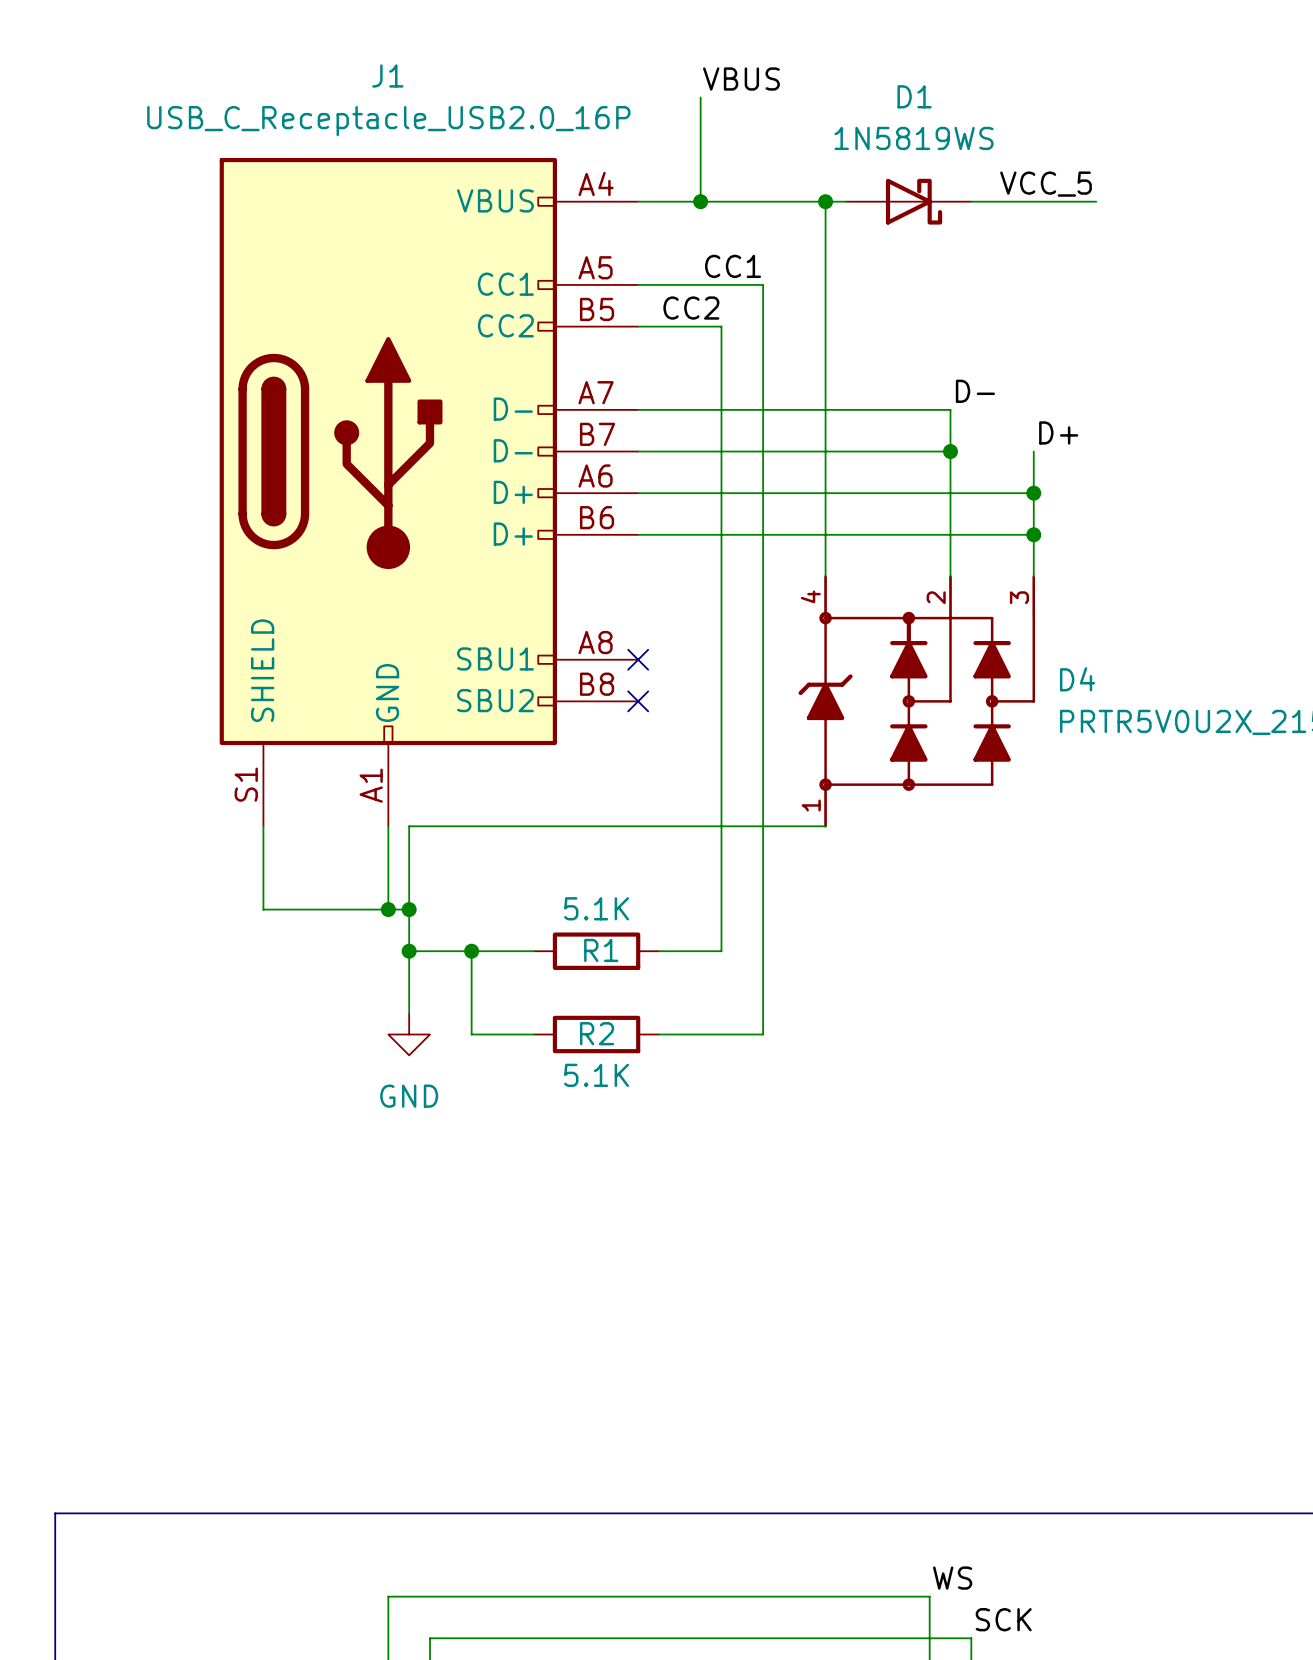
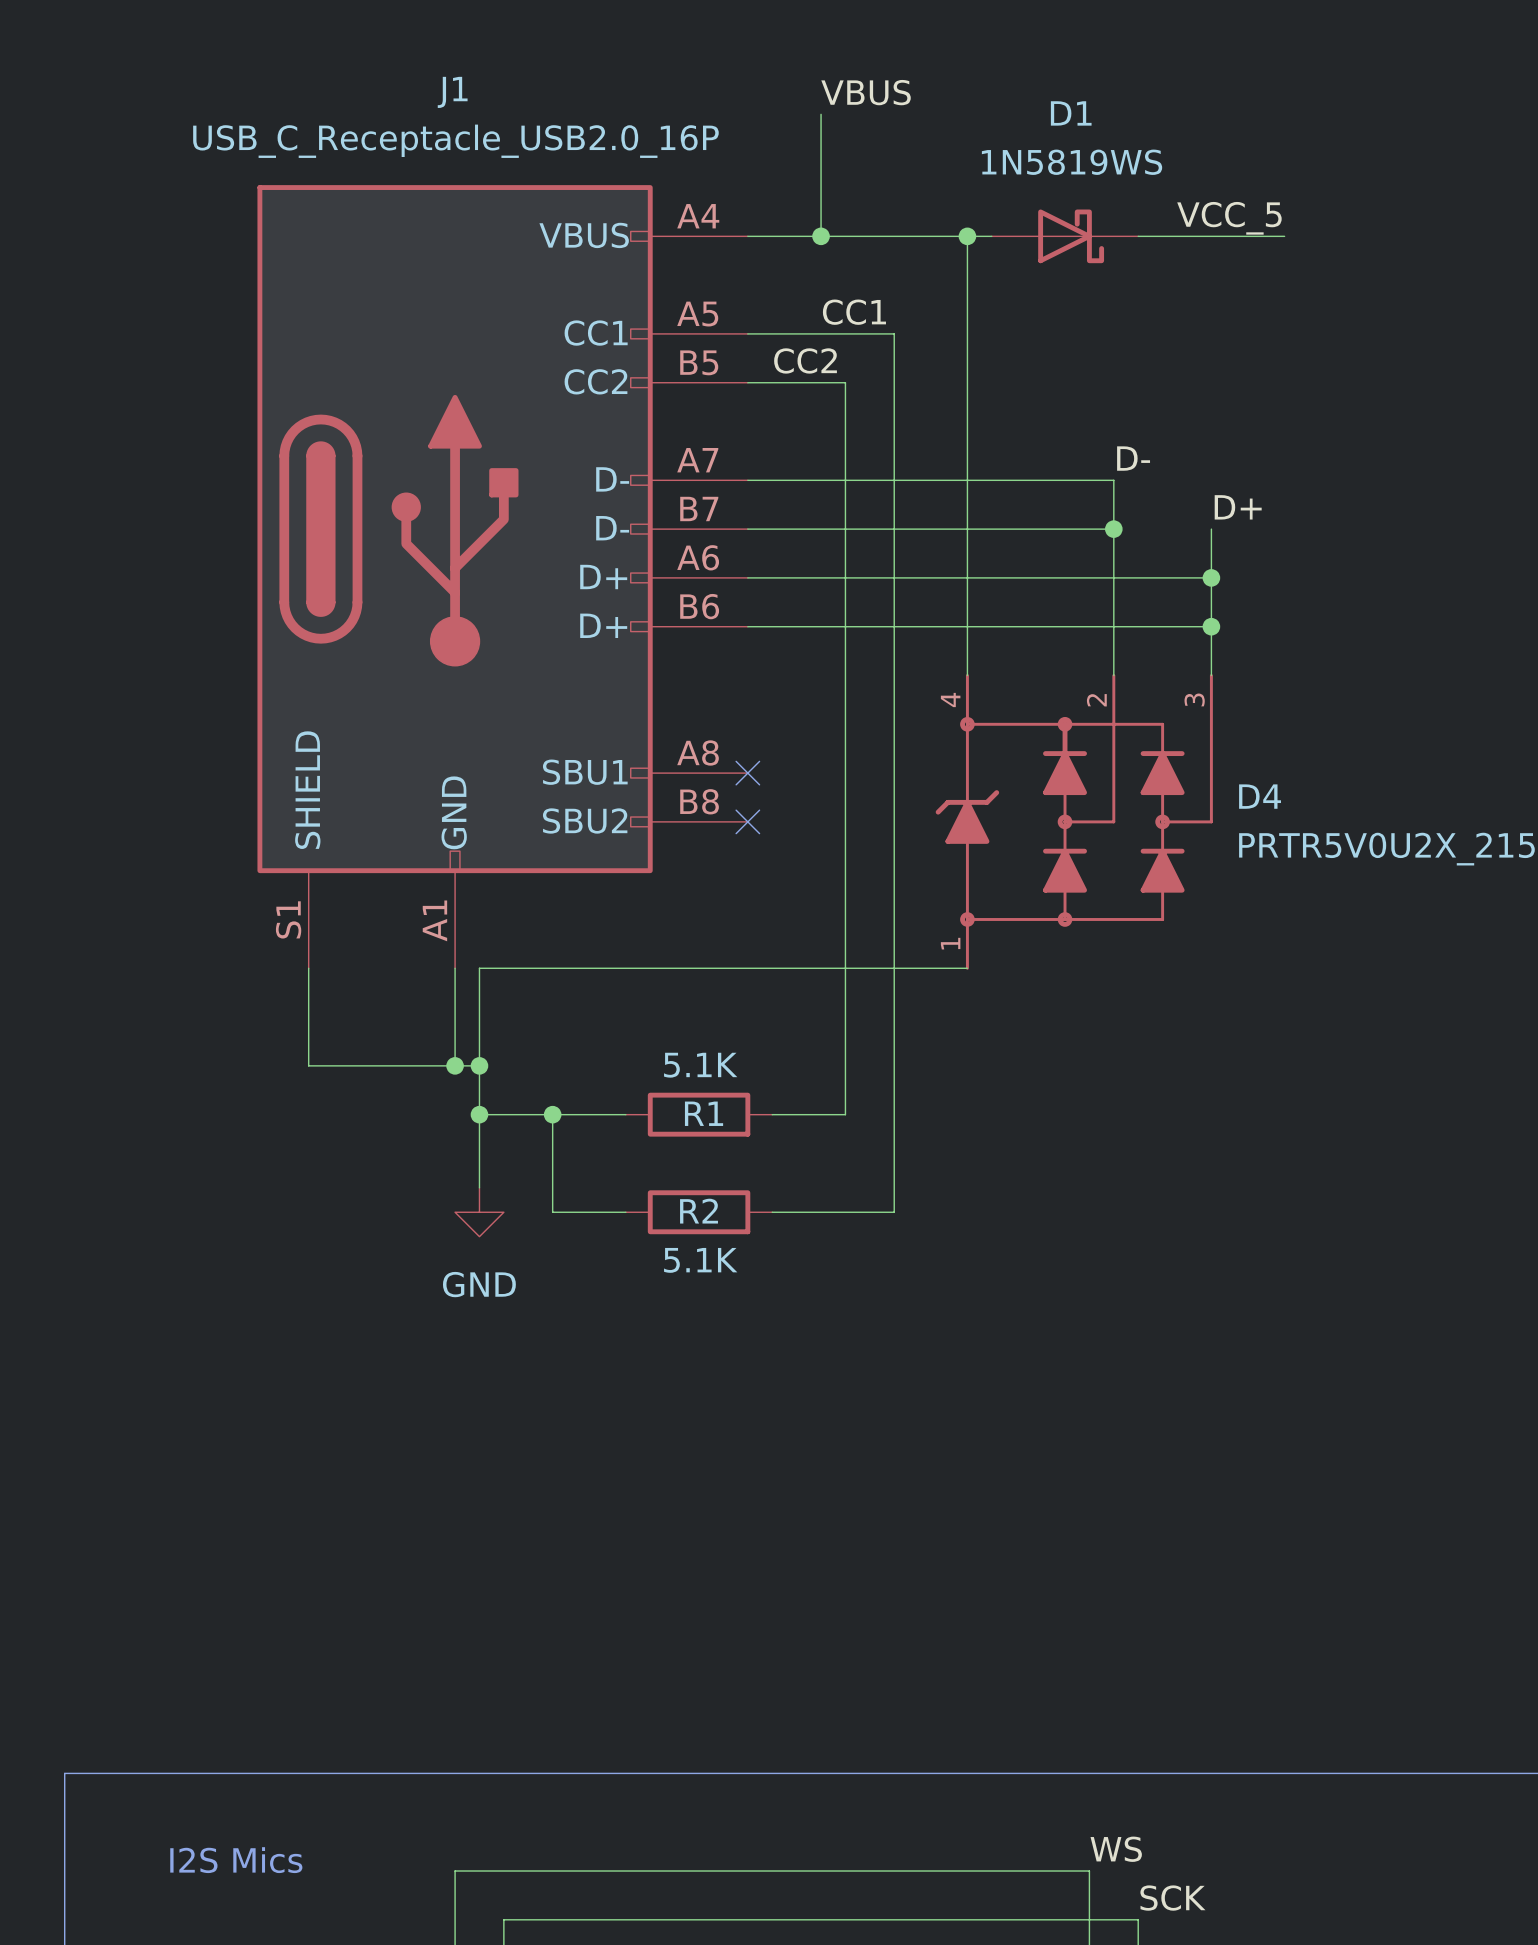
text: none -> I2S Mics (236, 1860)

